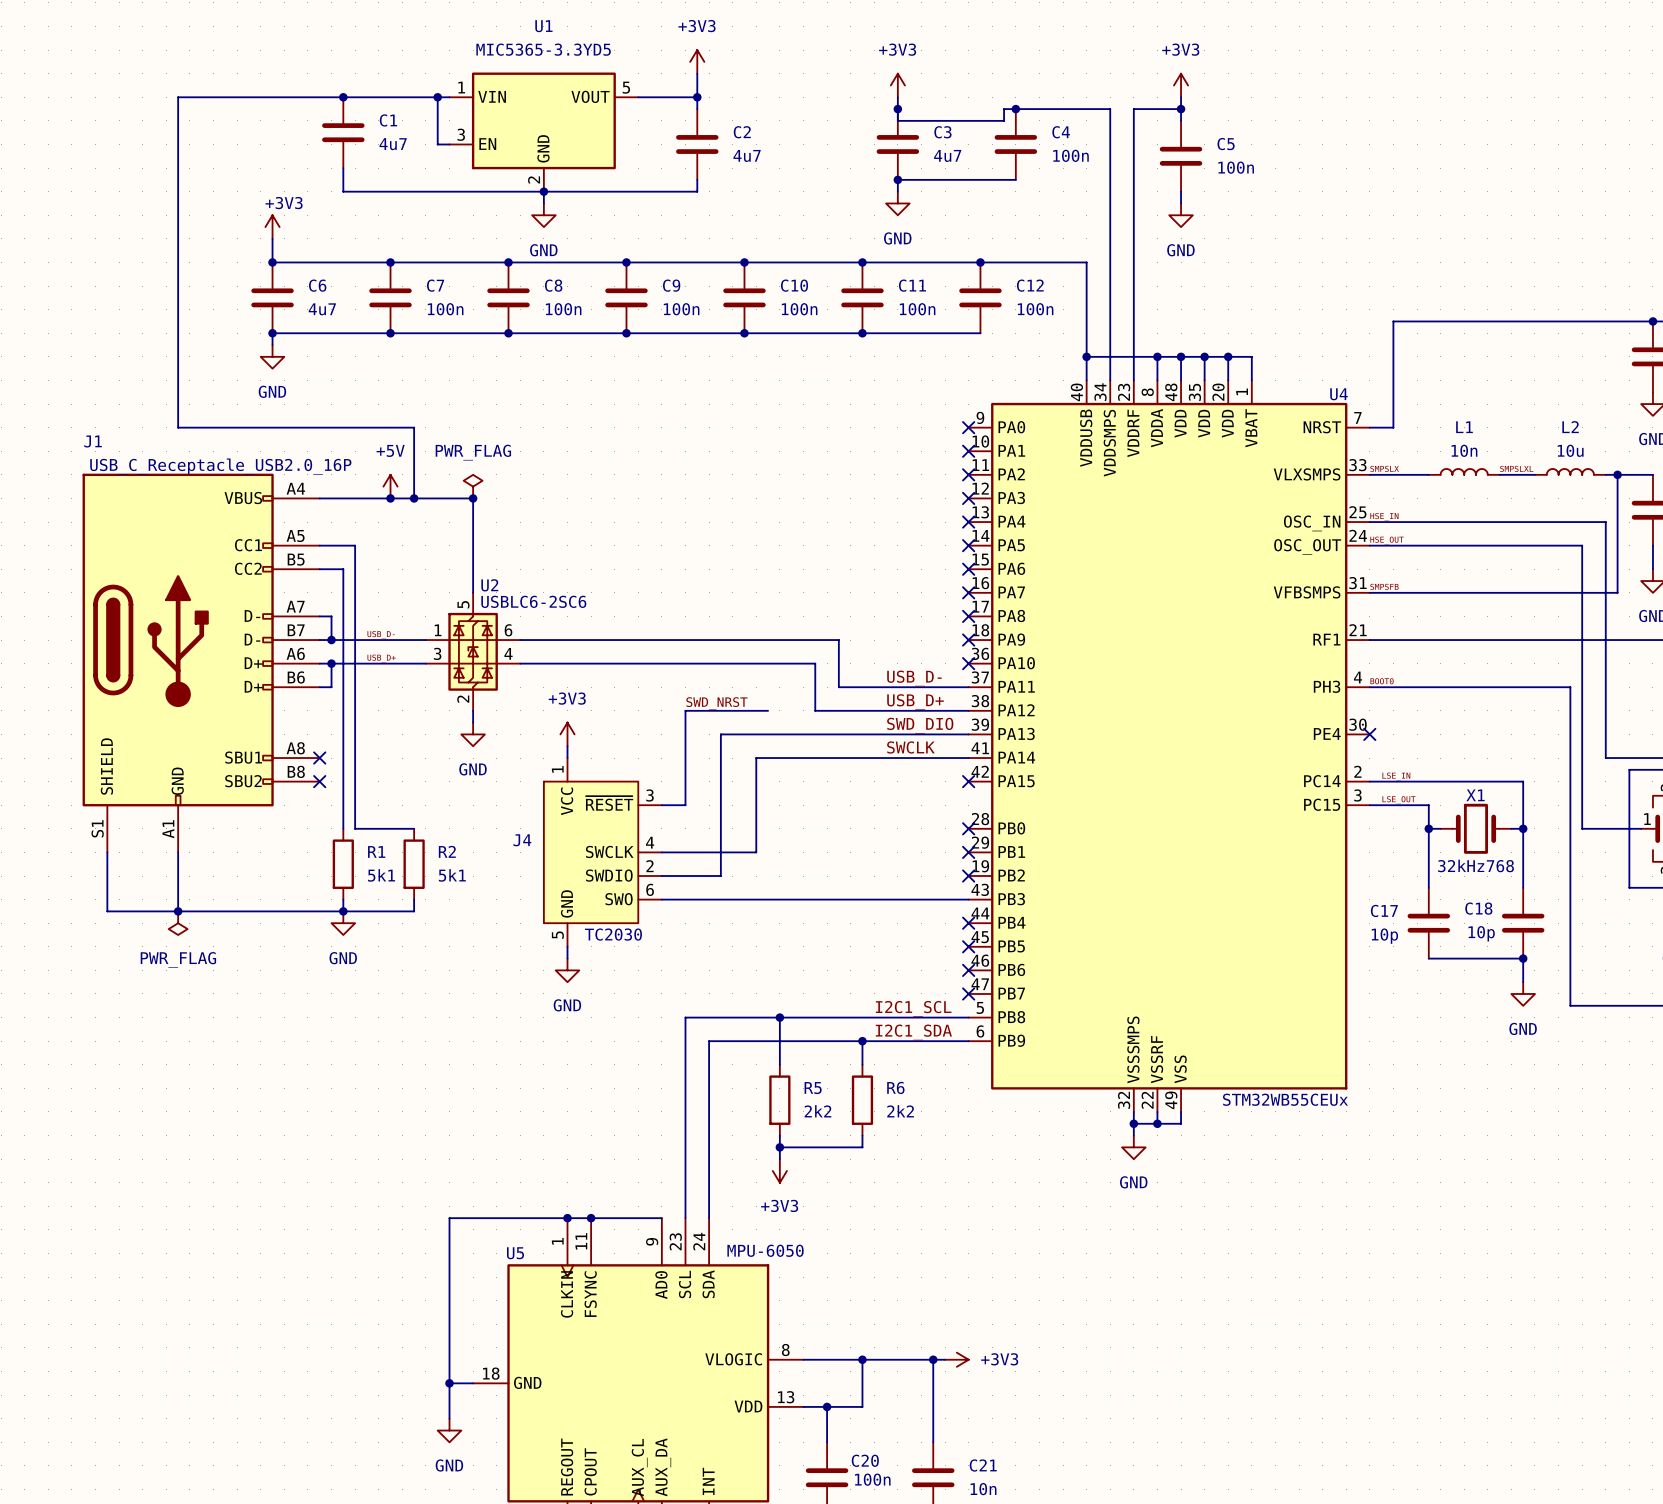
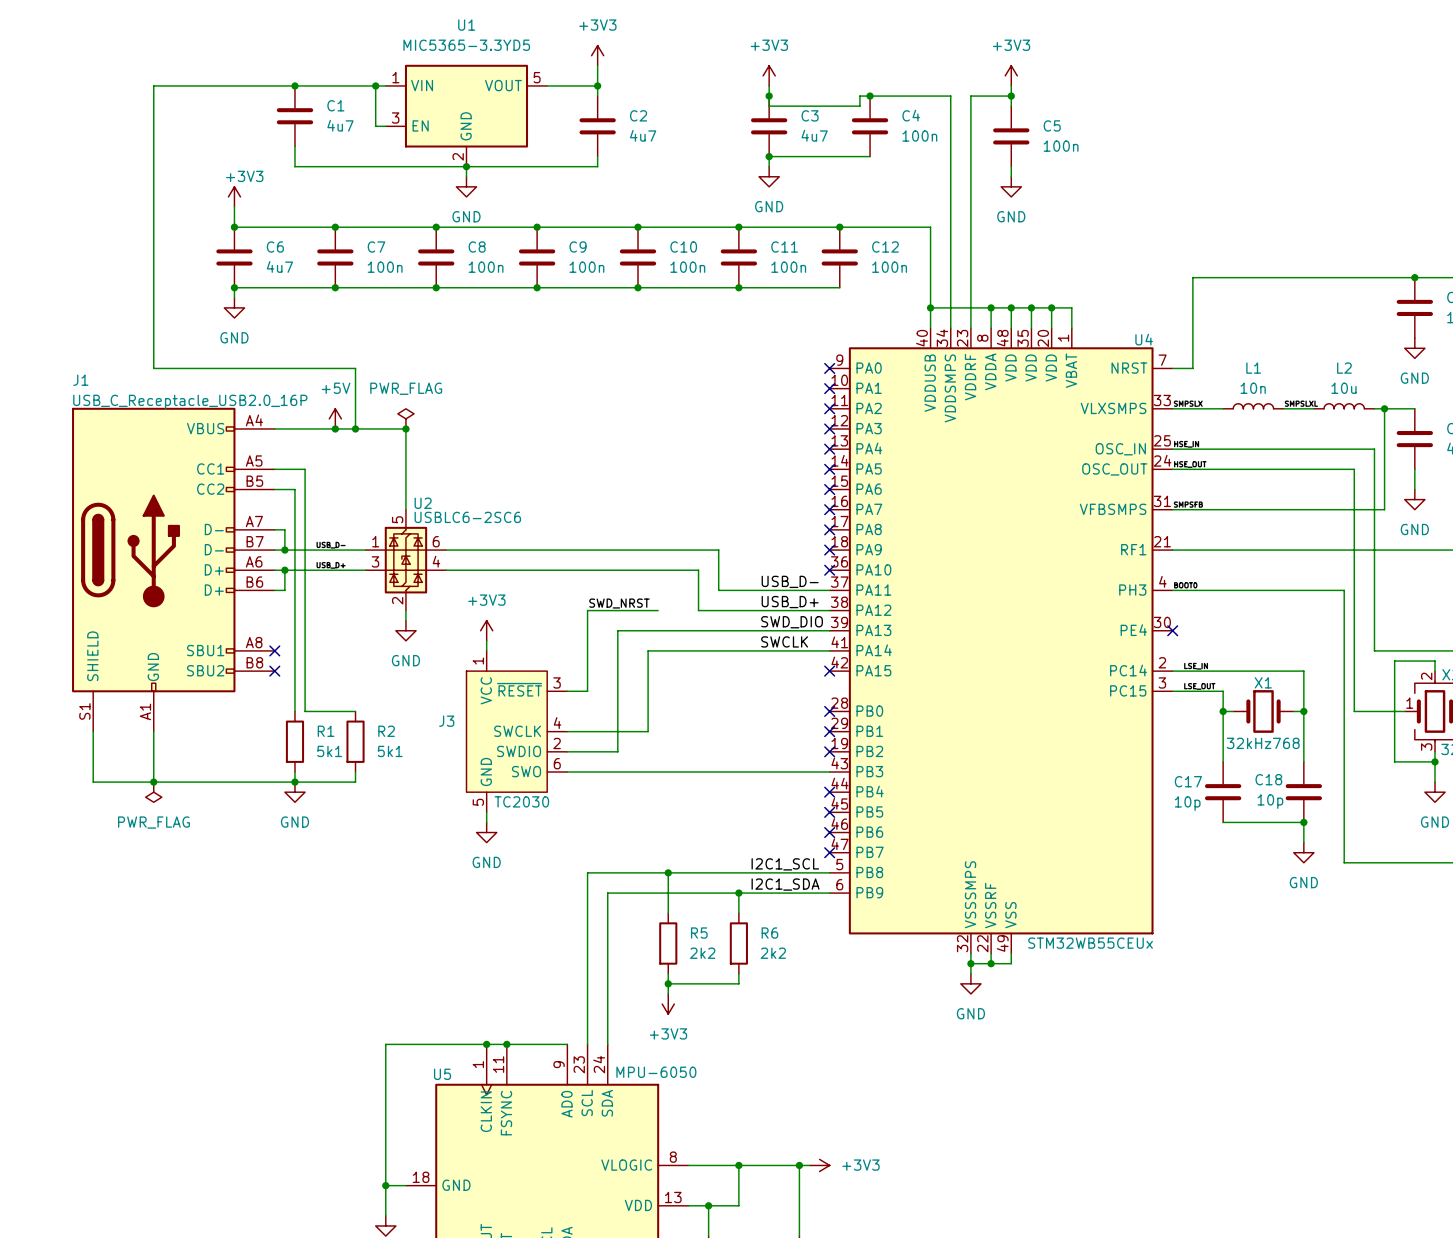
J4 name: J4 (522, 840) -> J3 (446, 721)

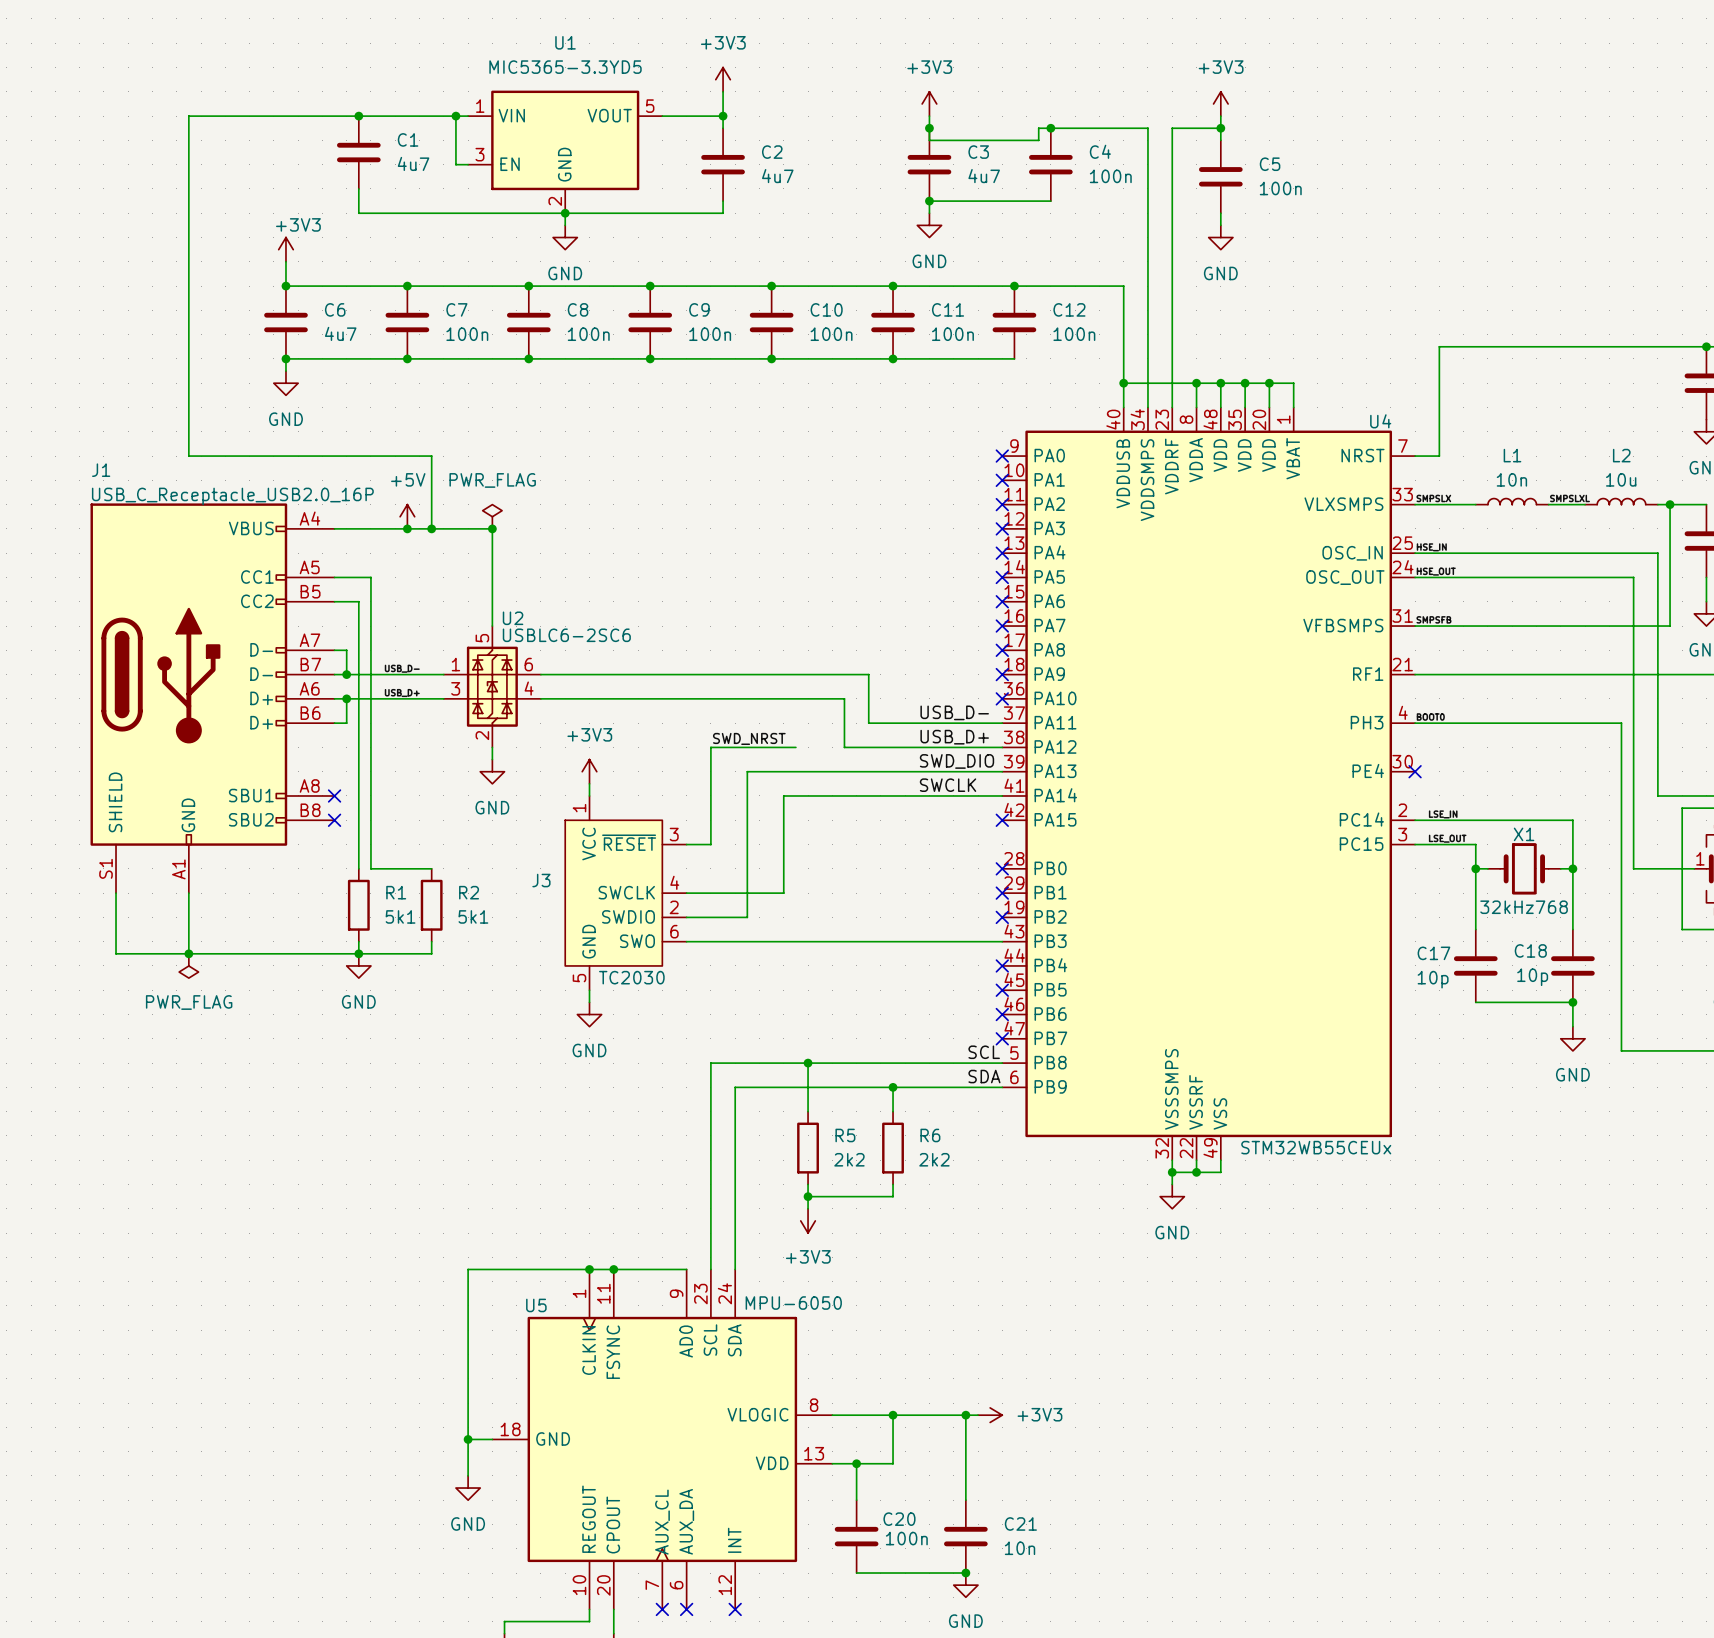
label: none -> SCL (984, 1052)
label: I2C1_SCL (785, 864) -> none
label: I2C1_SDA (785, 884) -> none
label: none -> SDA (984, 1076)

